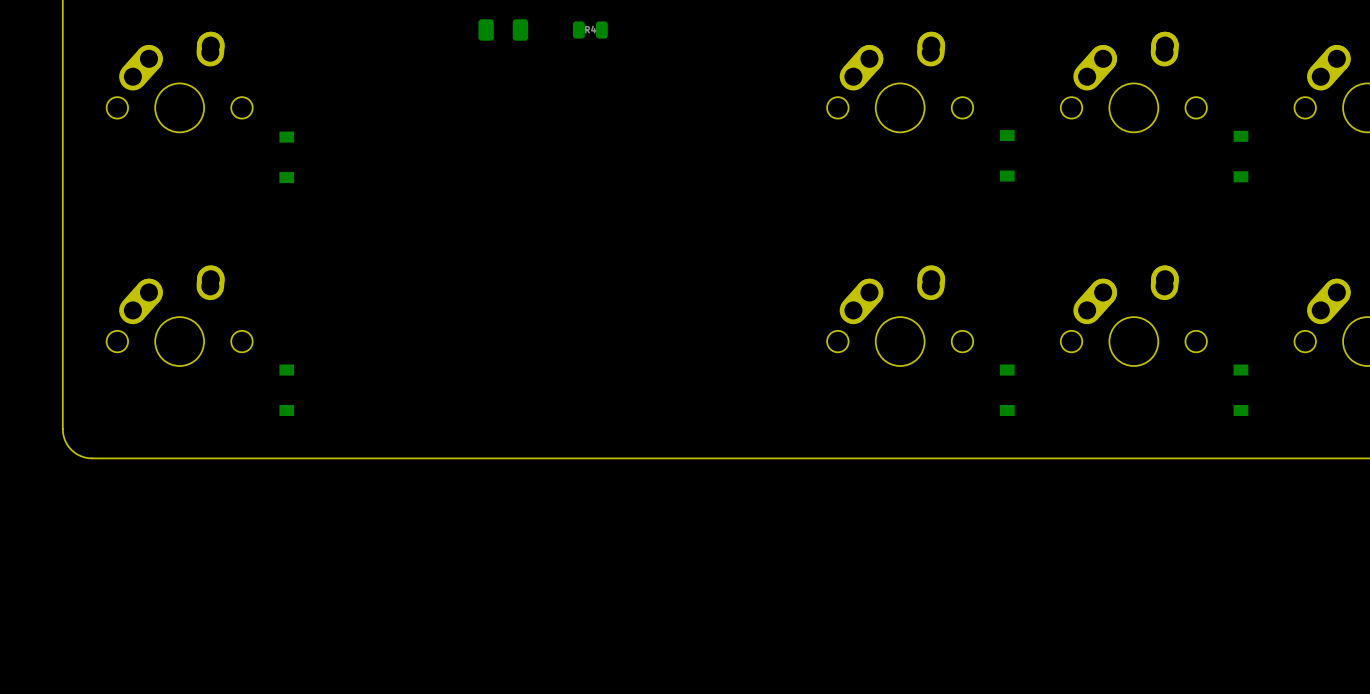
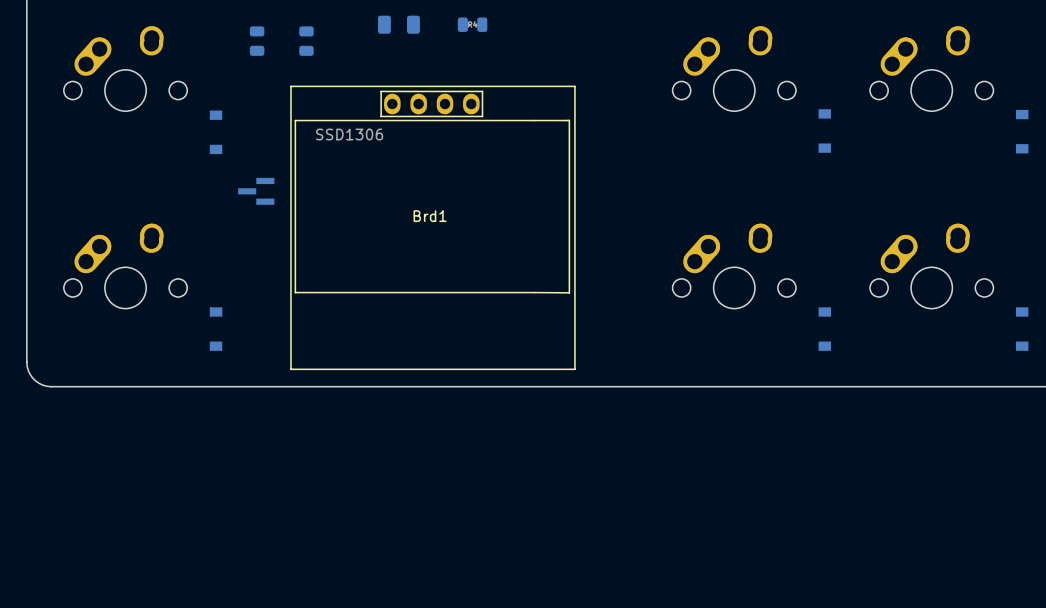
part: none -> (257, 41)
part: none -> (306, 41)
part: none -> (256, 191)
Brd1: none -> SSD1306 (432, 227)

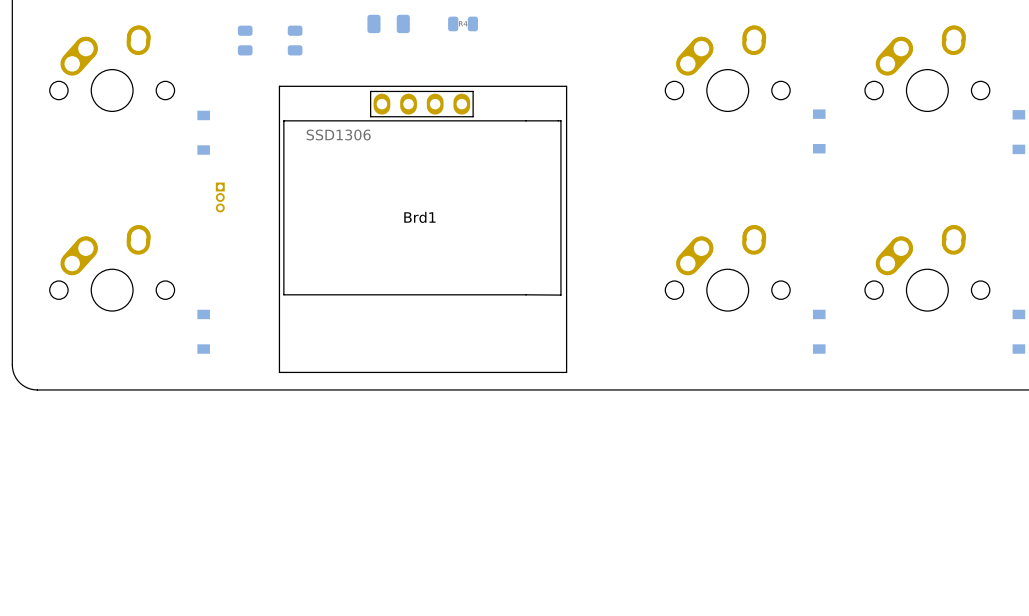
part: (256, 191) -> none
part: none -> (220, 197)

